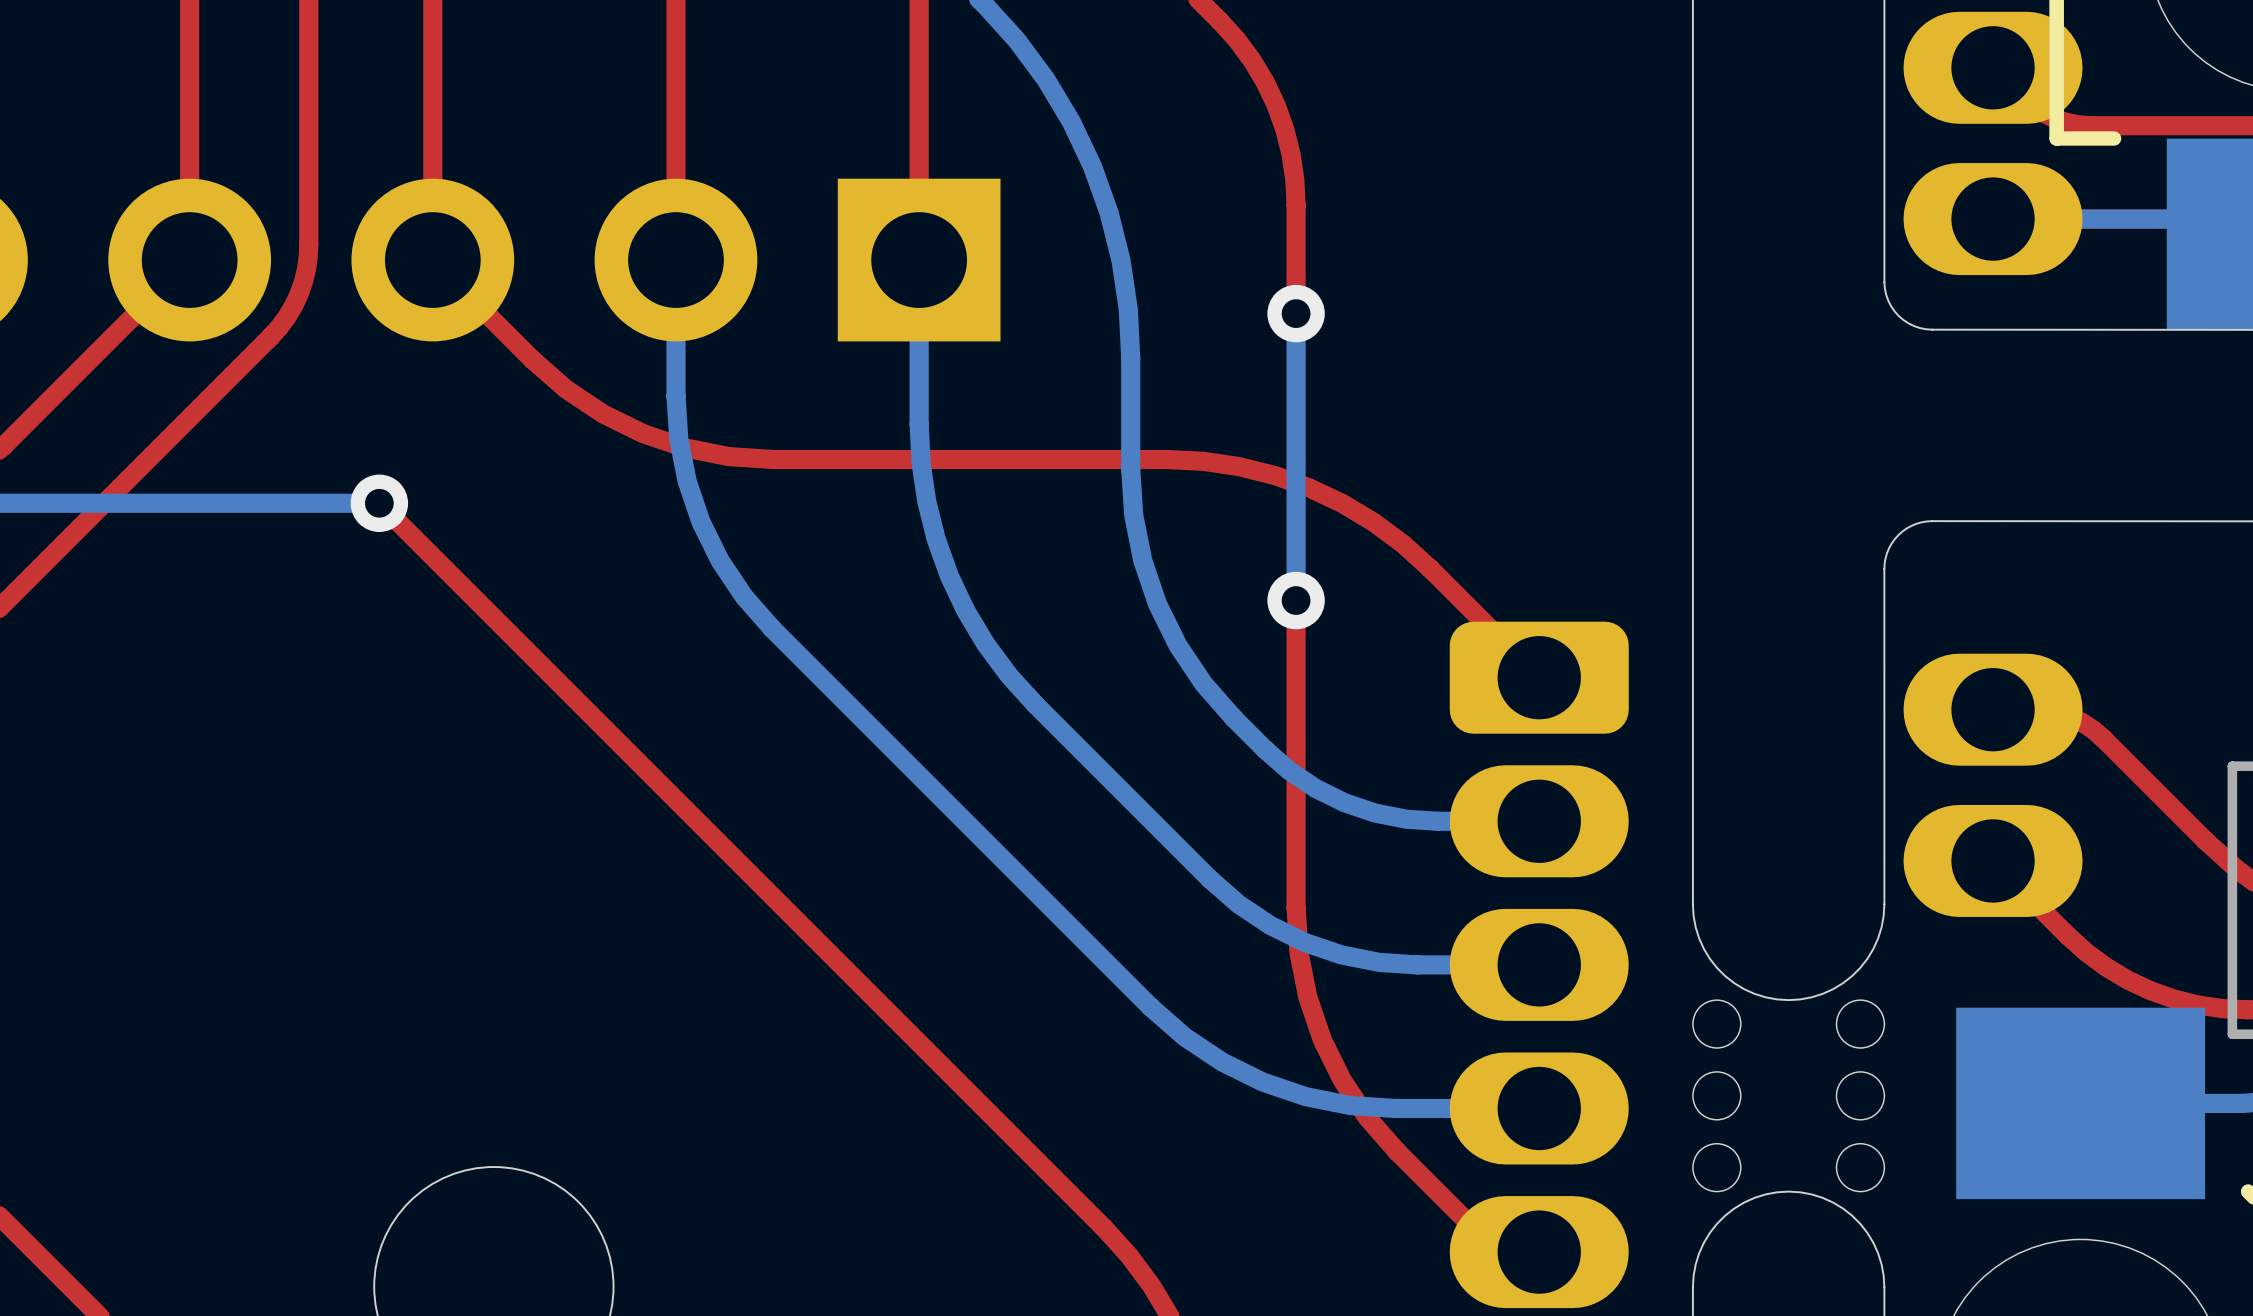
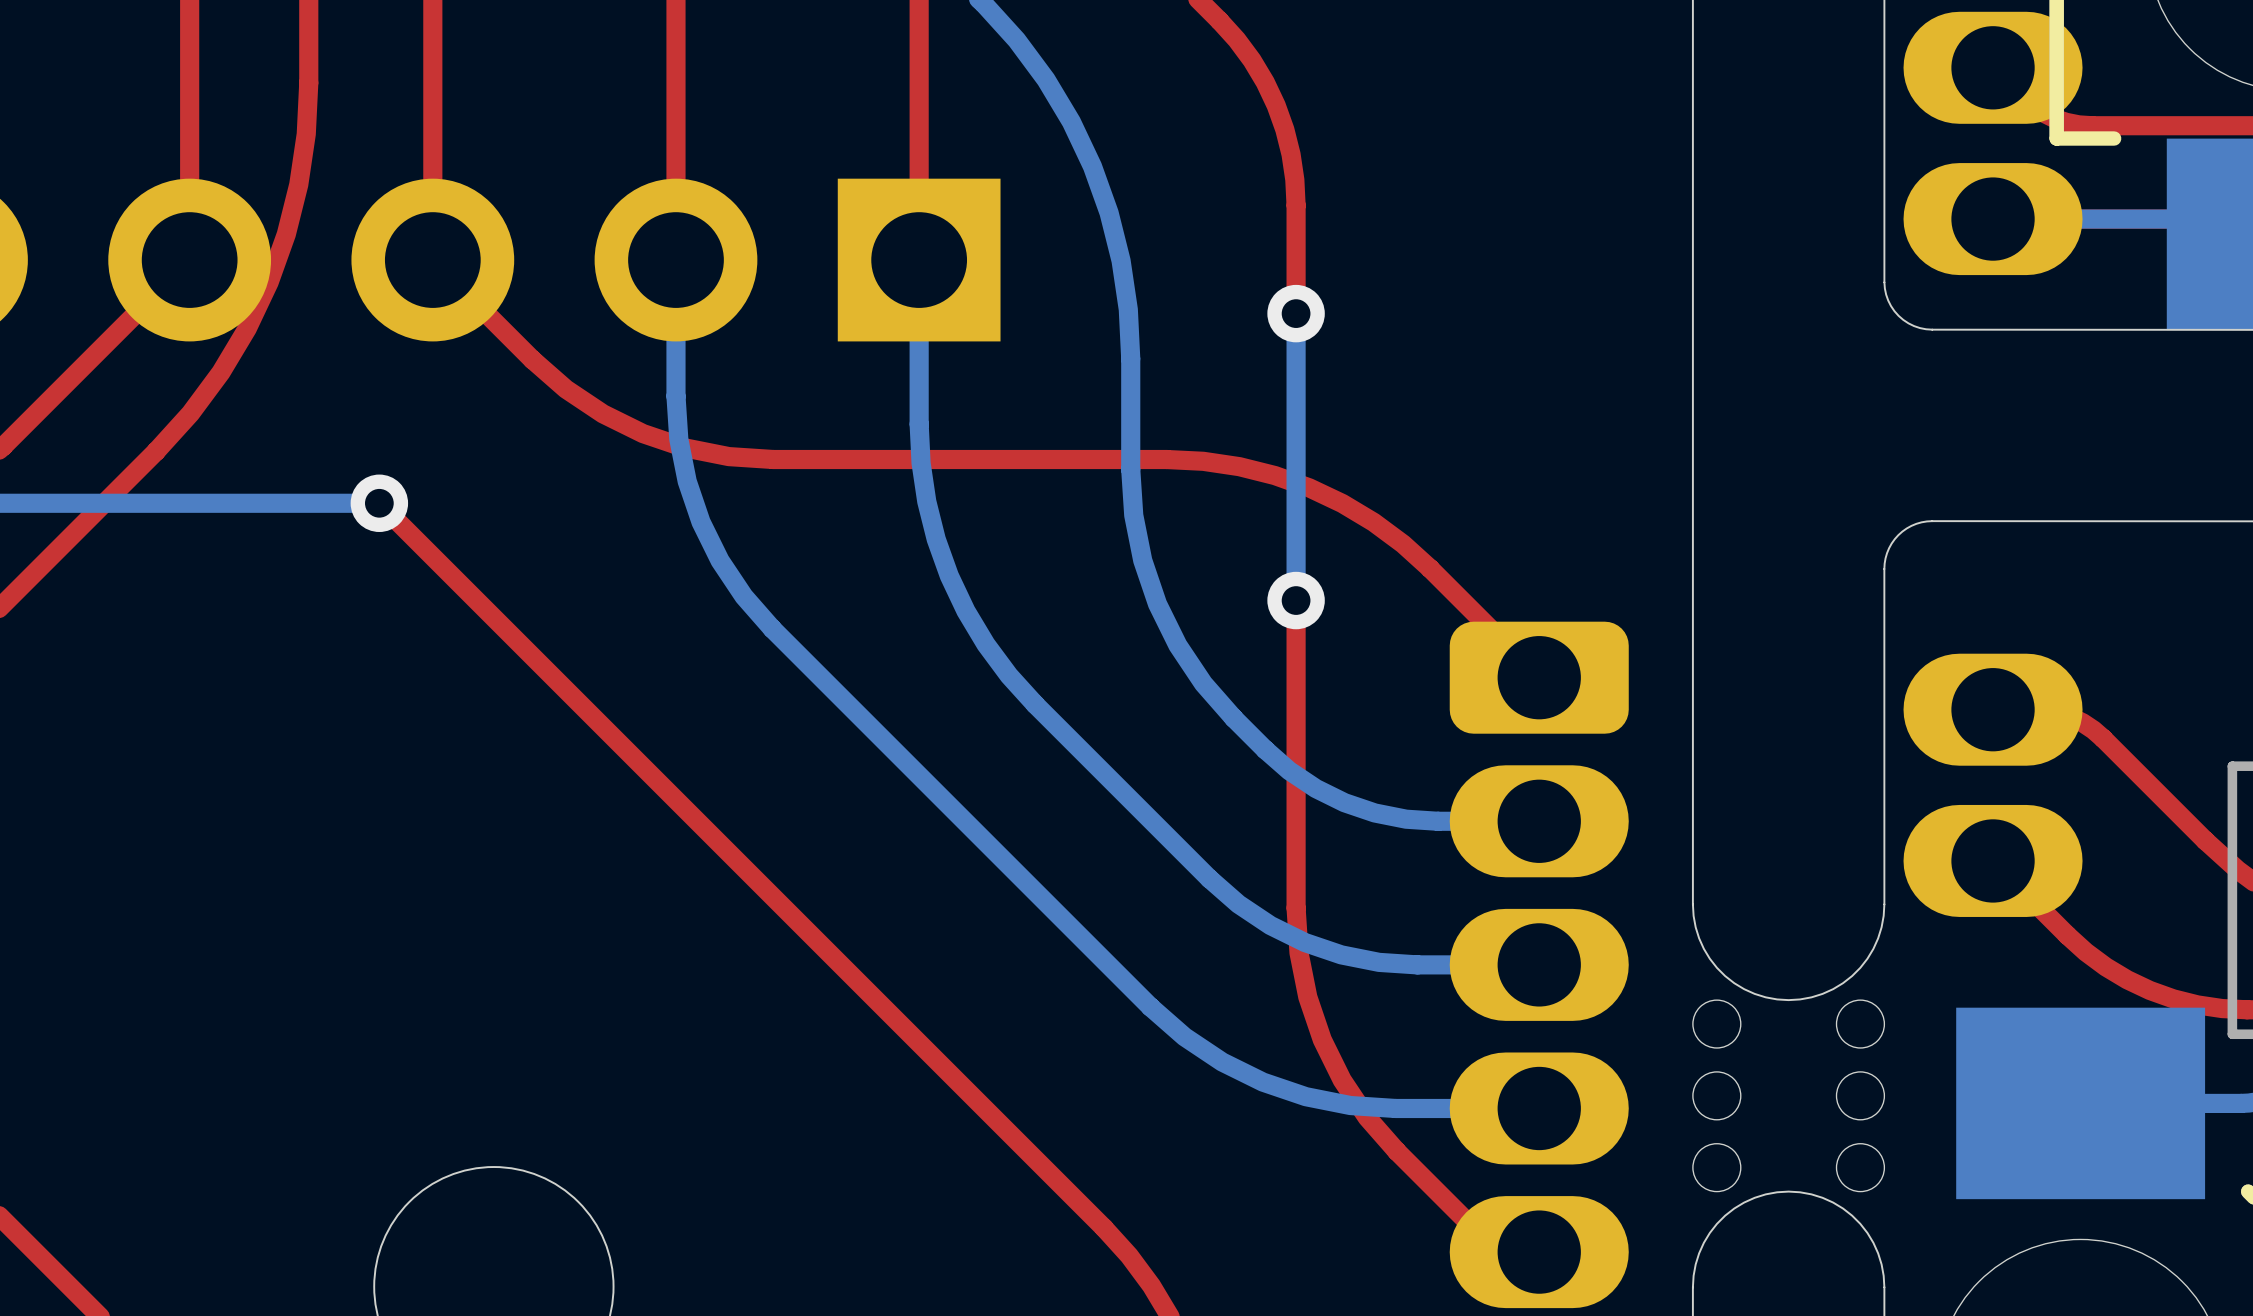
top track: (308, 82) (308, 244) (306, 270) (298, 294) (286, 317) (270, 336) (156, 451) -> (308, 82) (306, 134) (298, 184) (286, 234) (269, 282) (247, 328) (220, 372) (190, 413) (156, 451)

